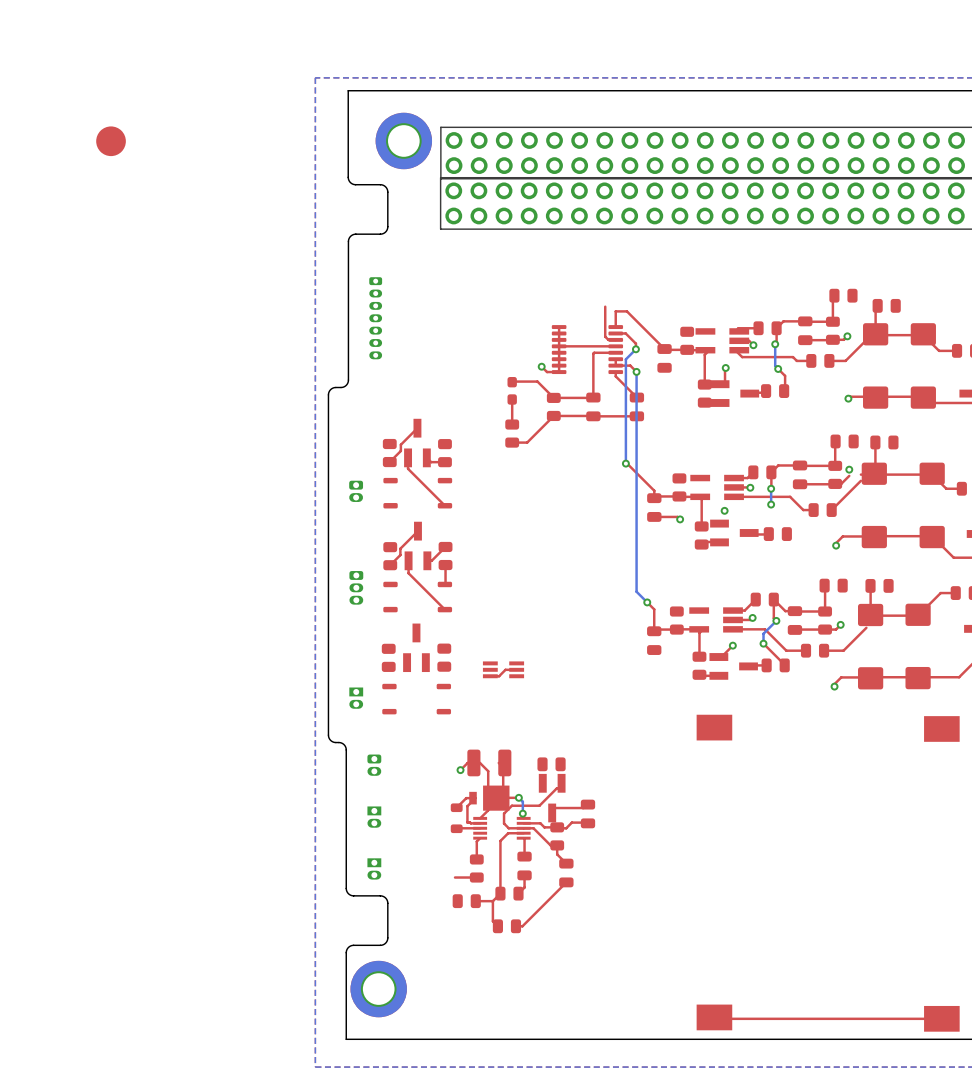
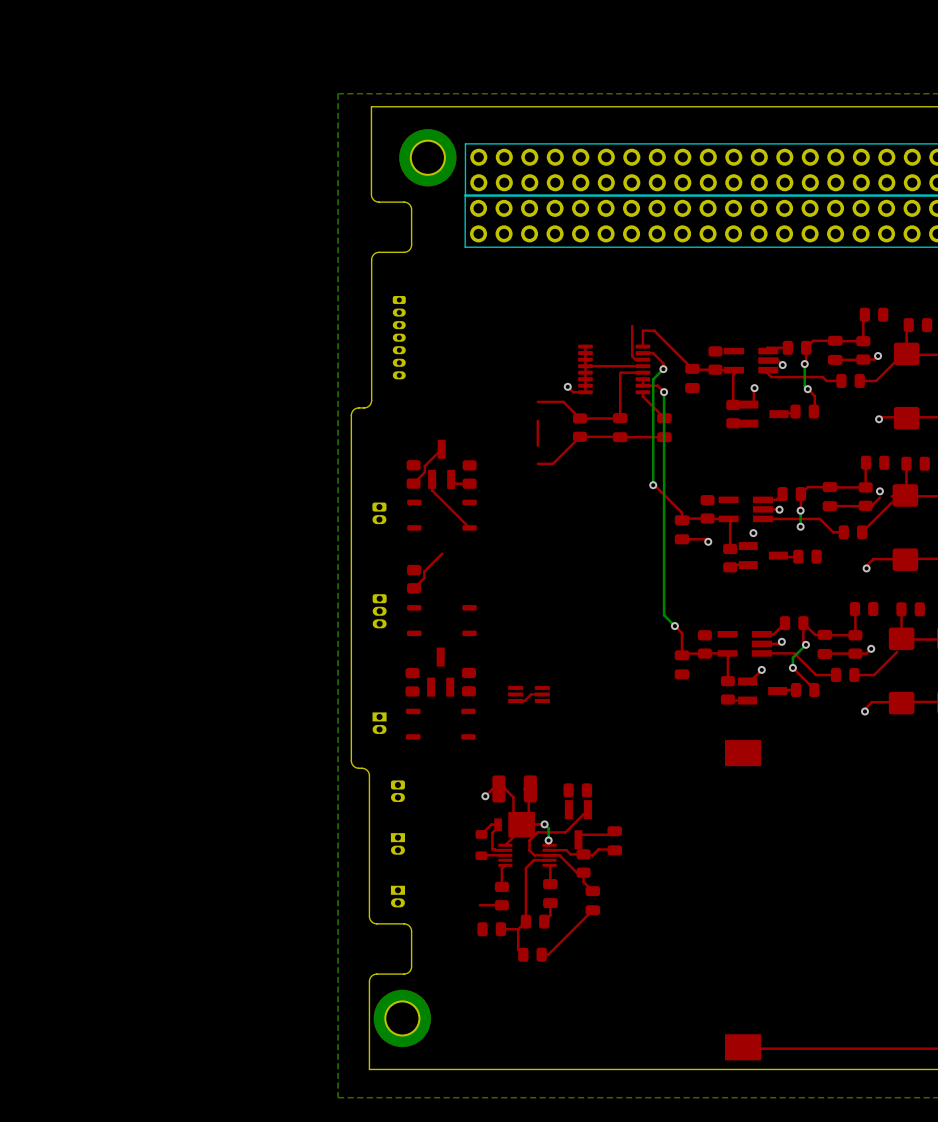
part: (111, 141) -> none
part: (512, 390) -> none
part: (512, 433) -> none
part: (417, 545) -> none
top track: (445, 546) (431, 560) (427, 560) -> none
part: (445, 556) -> none
top track: (408, 560) (408, 573) (444, 609) -> none
top track: (445, 565) (444, 584) -> none

